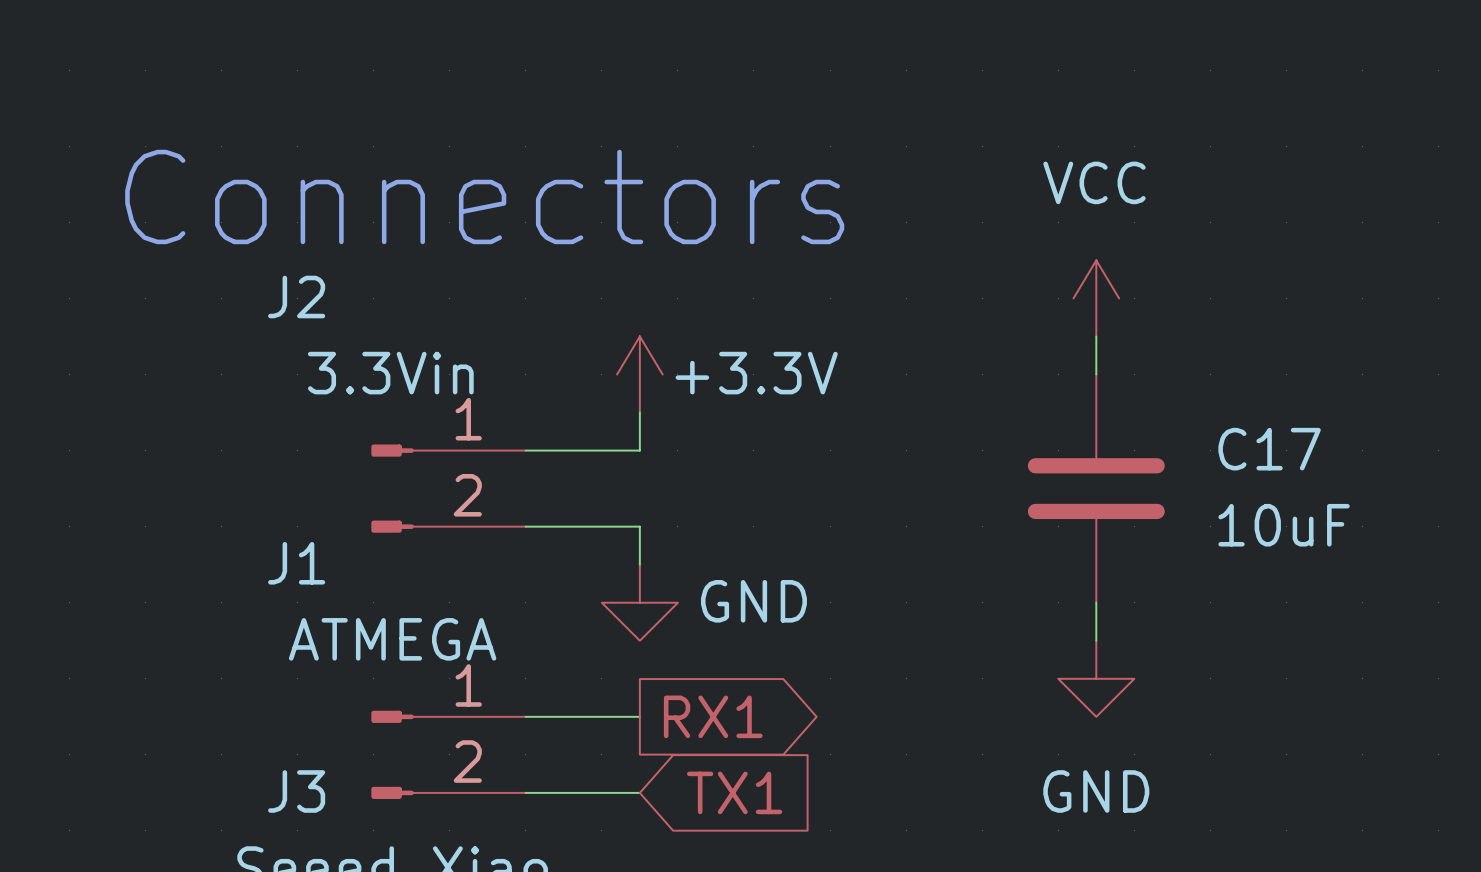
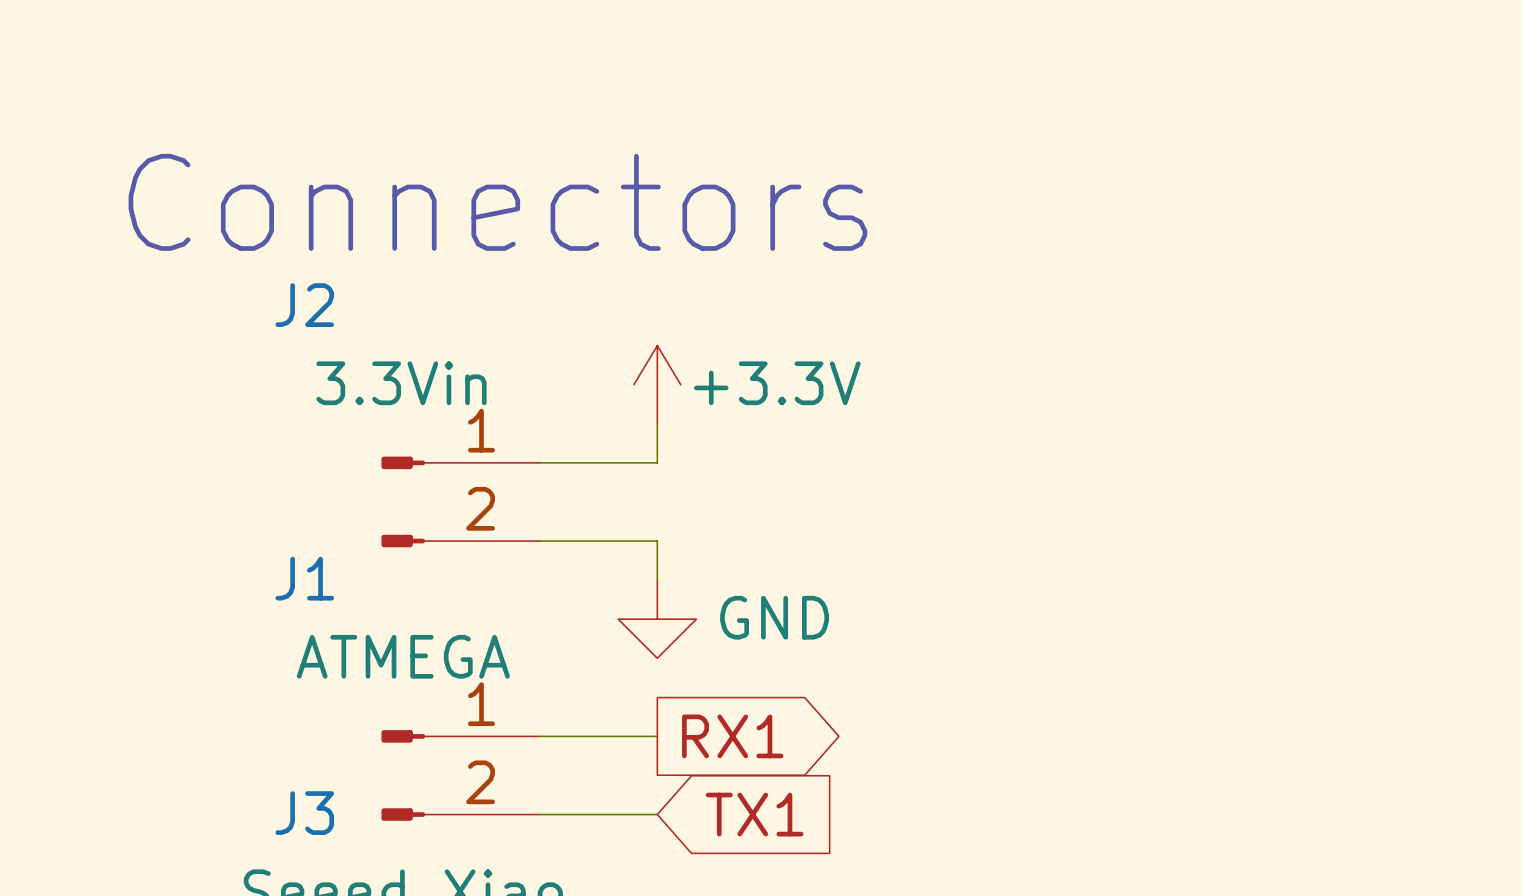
power symbol: VCC (1096, 298) -> none
wire: (1096, 336) (1096, 374) -> none
C17: 10uF (1096, 488) -> none
wire: (1096, 602) (1096, 640) -> none
power symbol: GND (1096, 678) -> none

